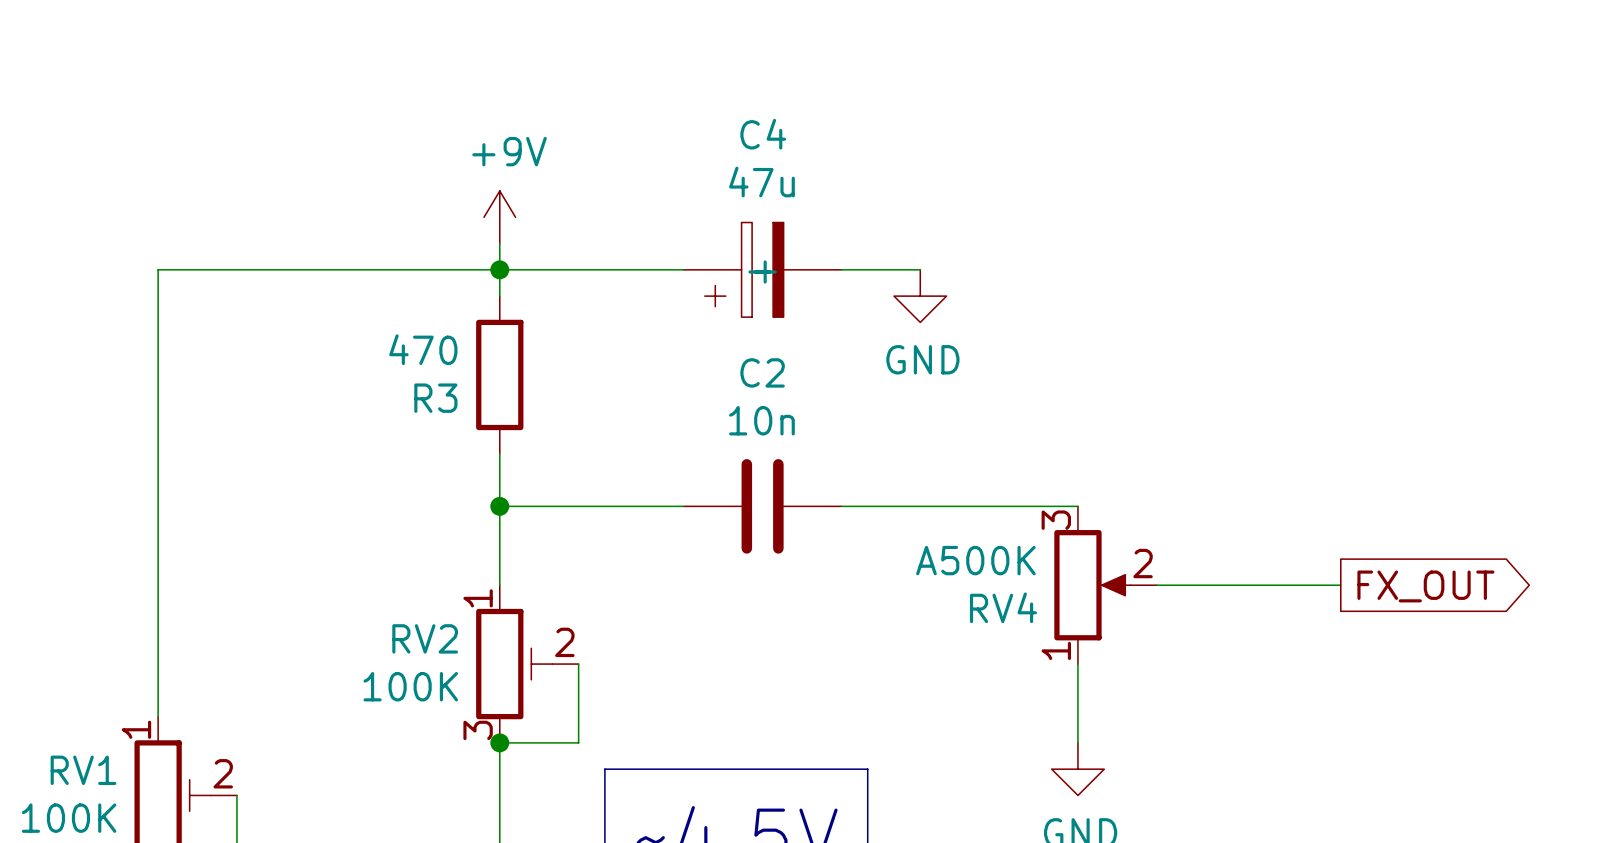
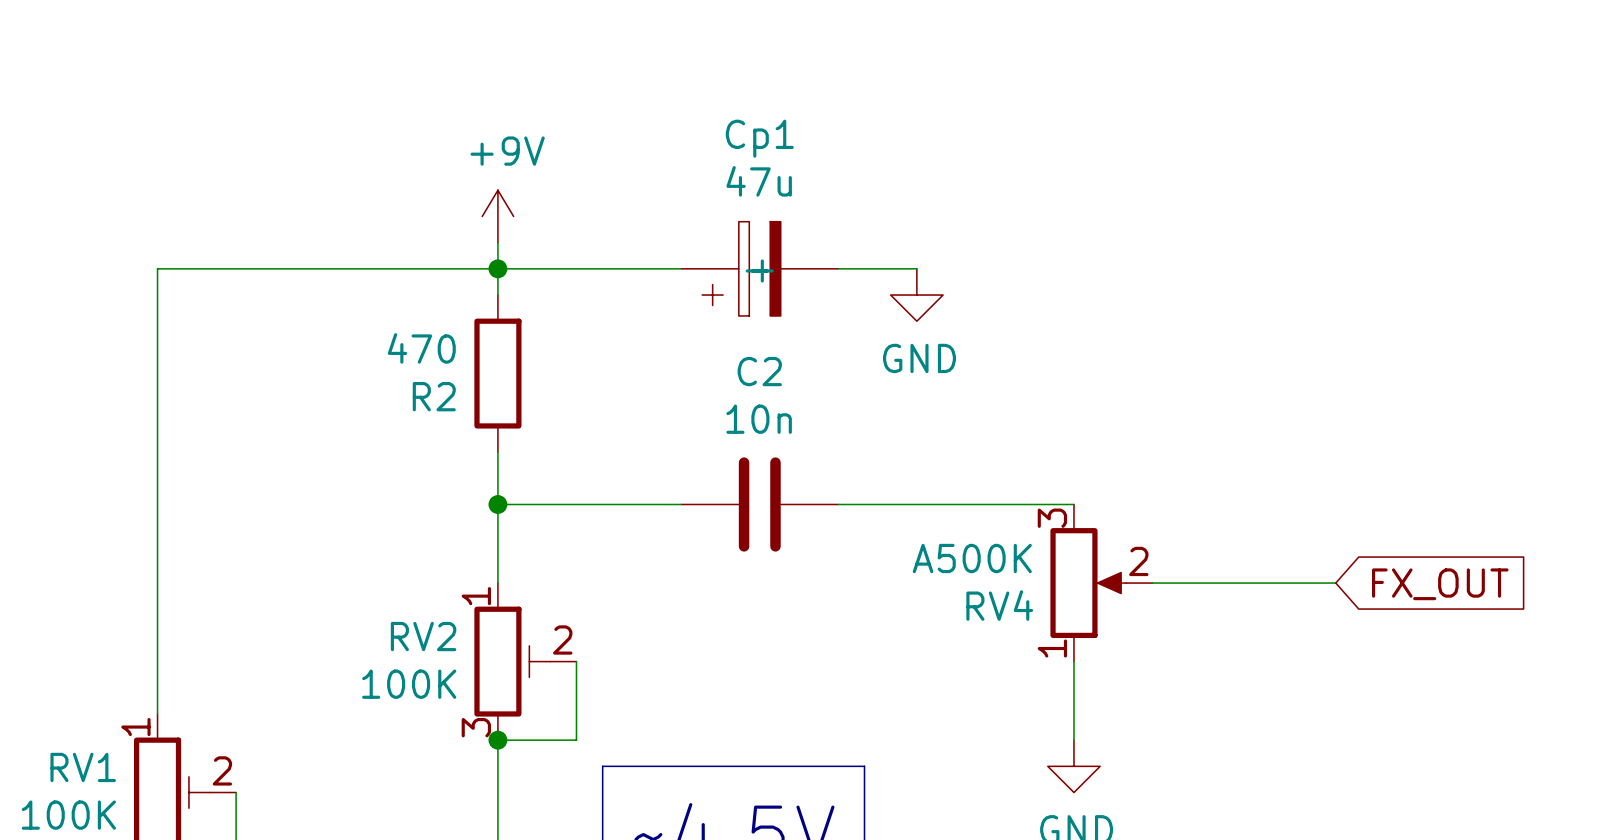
C4 name: C4 (763, 134) -> Cp1 (759, 138)
R3 name: R3 (435, 398) -> R2 (434, 396)
global label shape: output (1425, 586) -> input (1440, 584)

